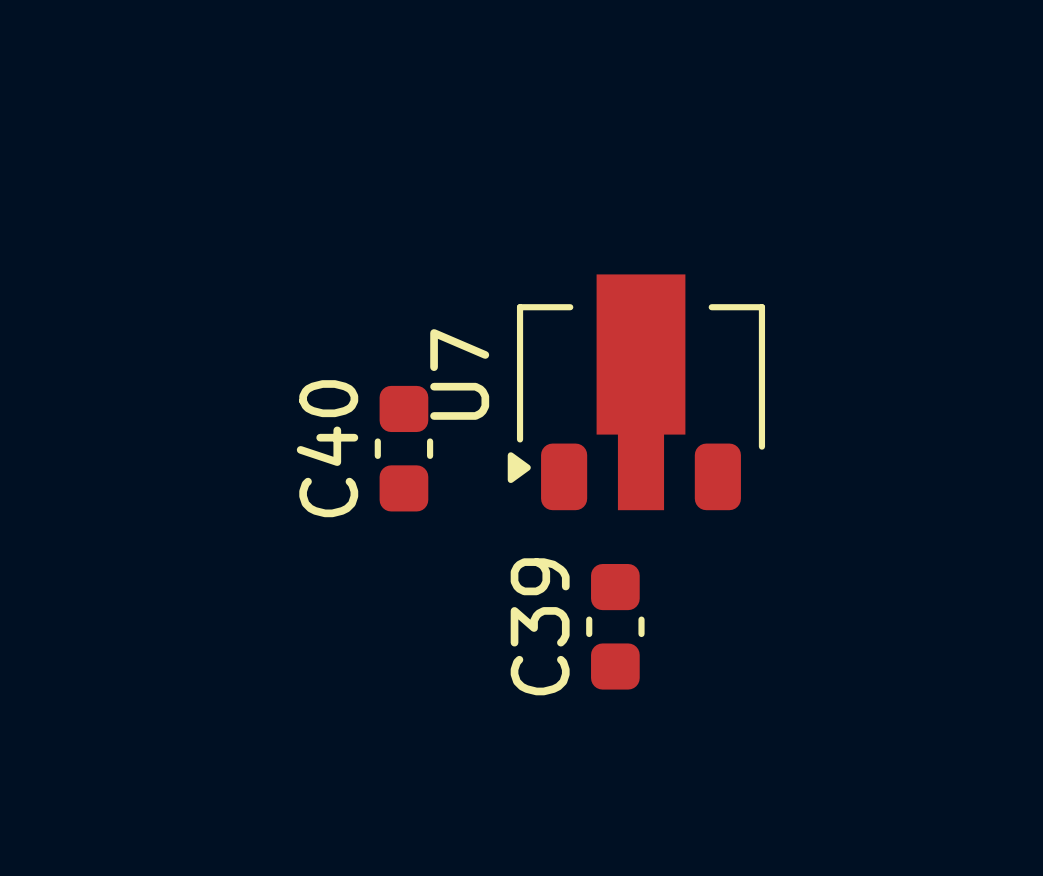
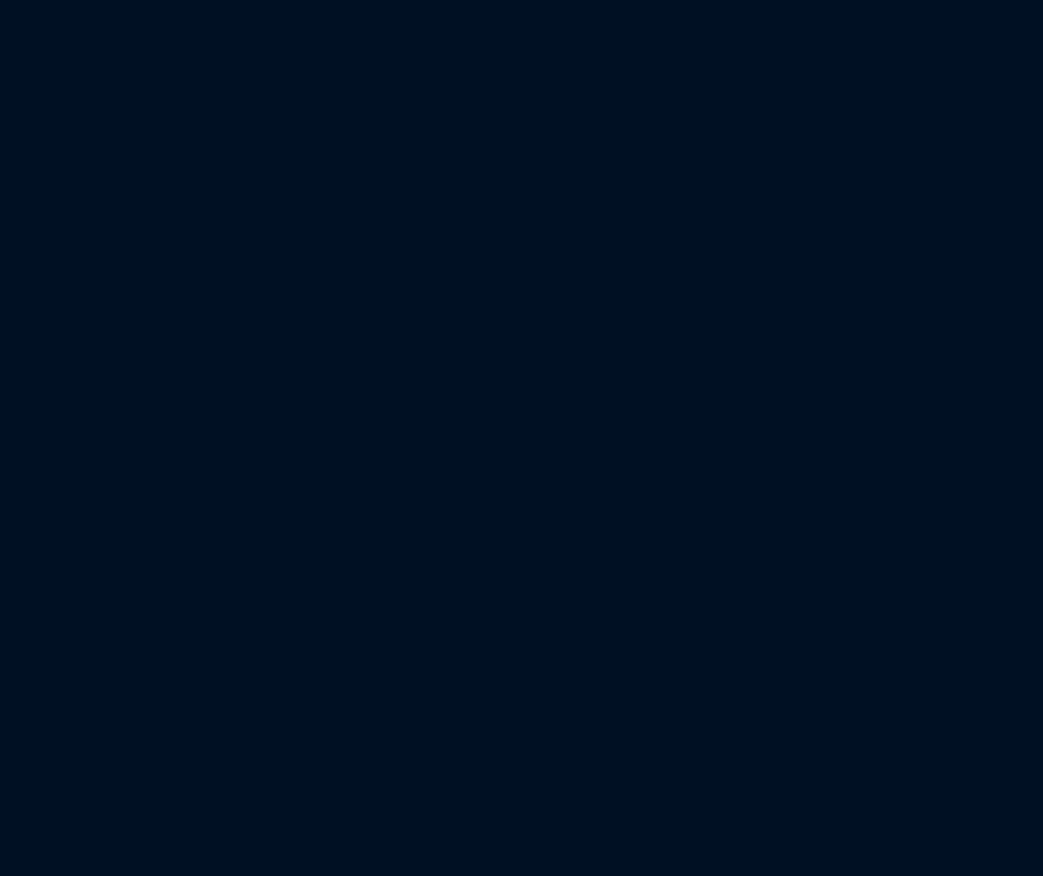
U7: (636, 392) -> none
C40: (403, 448) -> none
C39: (615, 626) -> none

